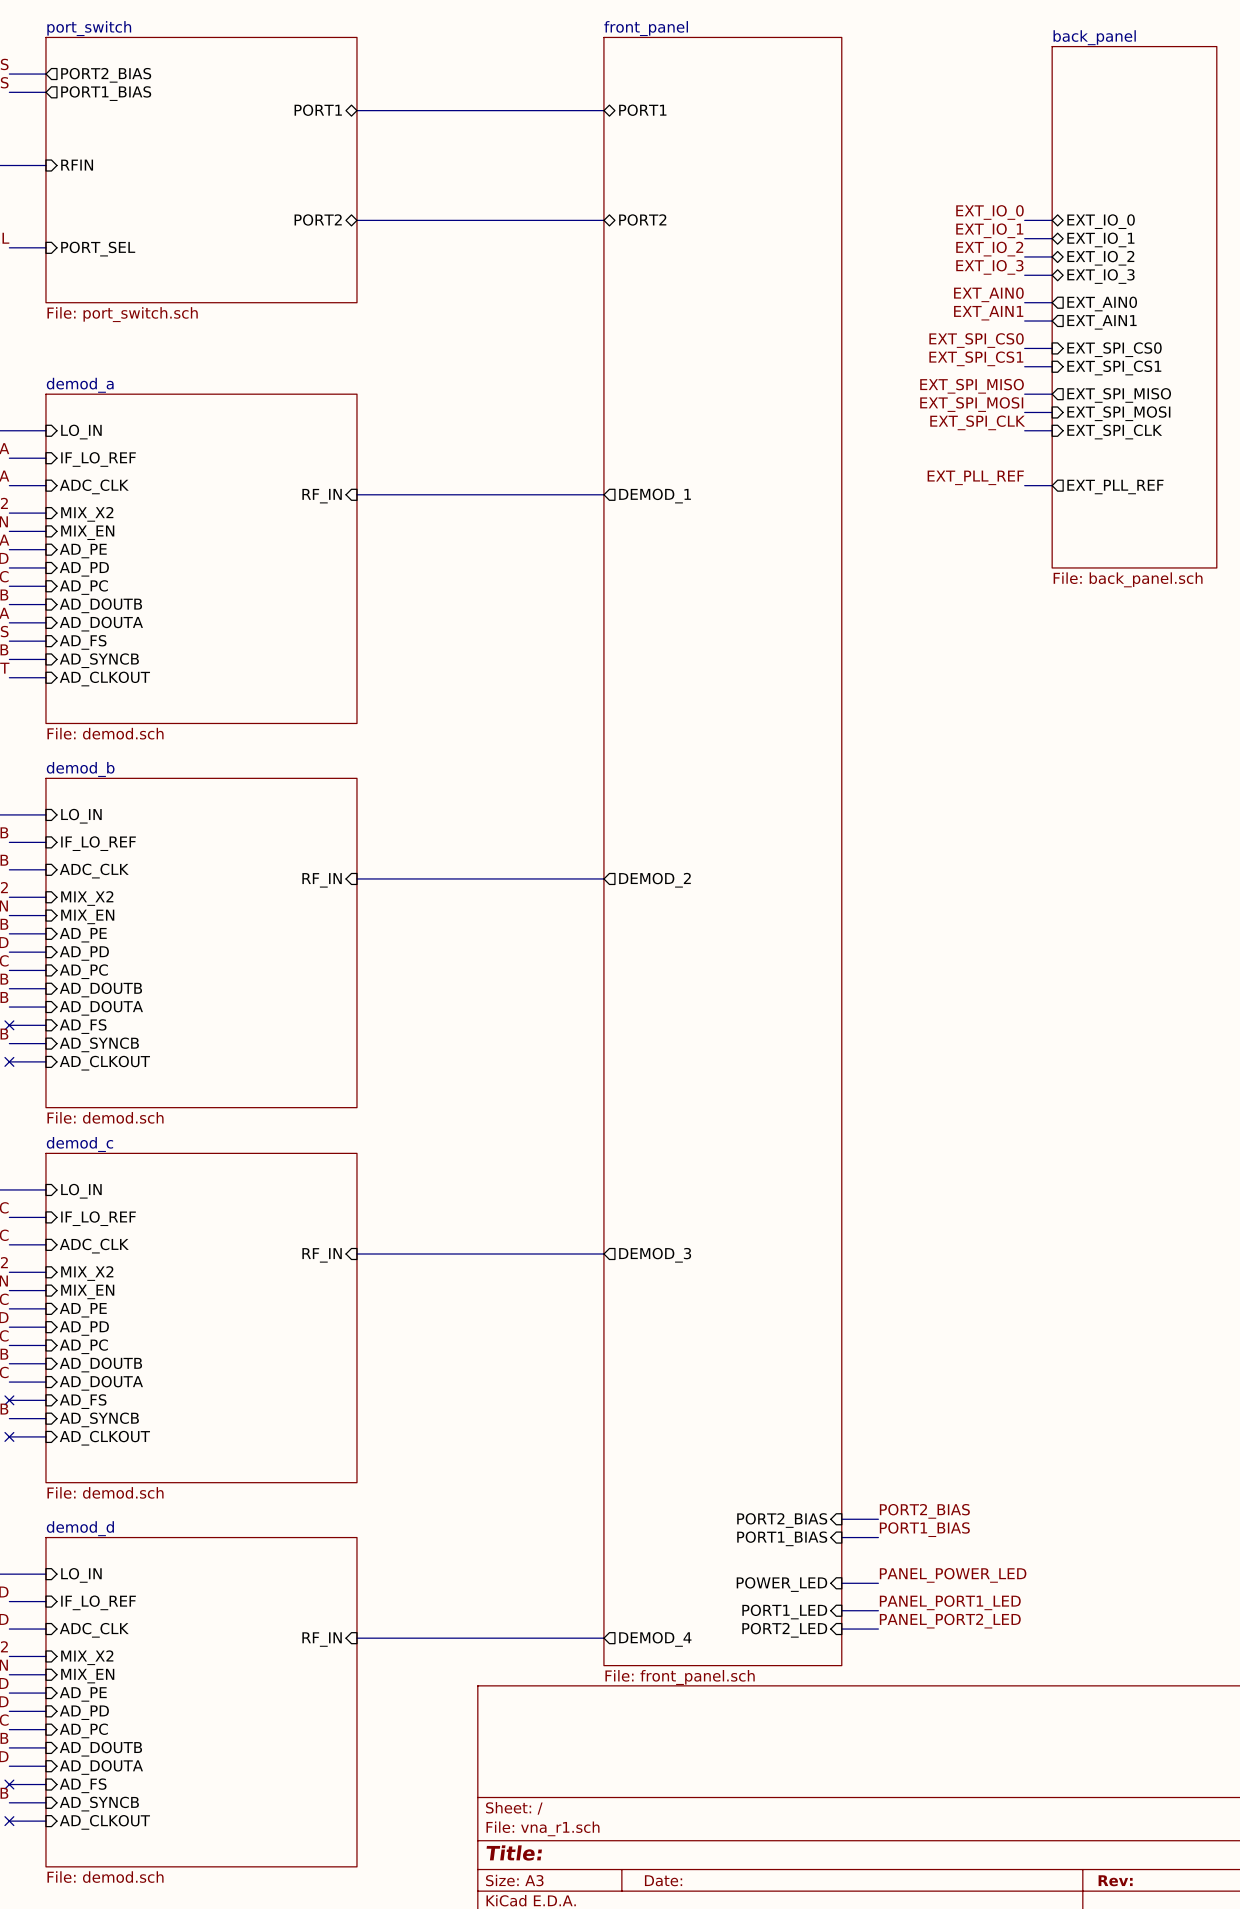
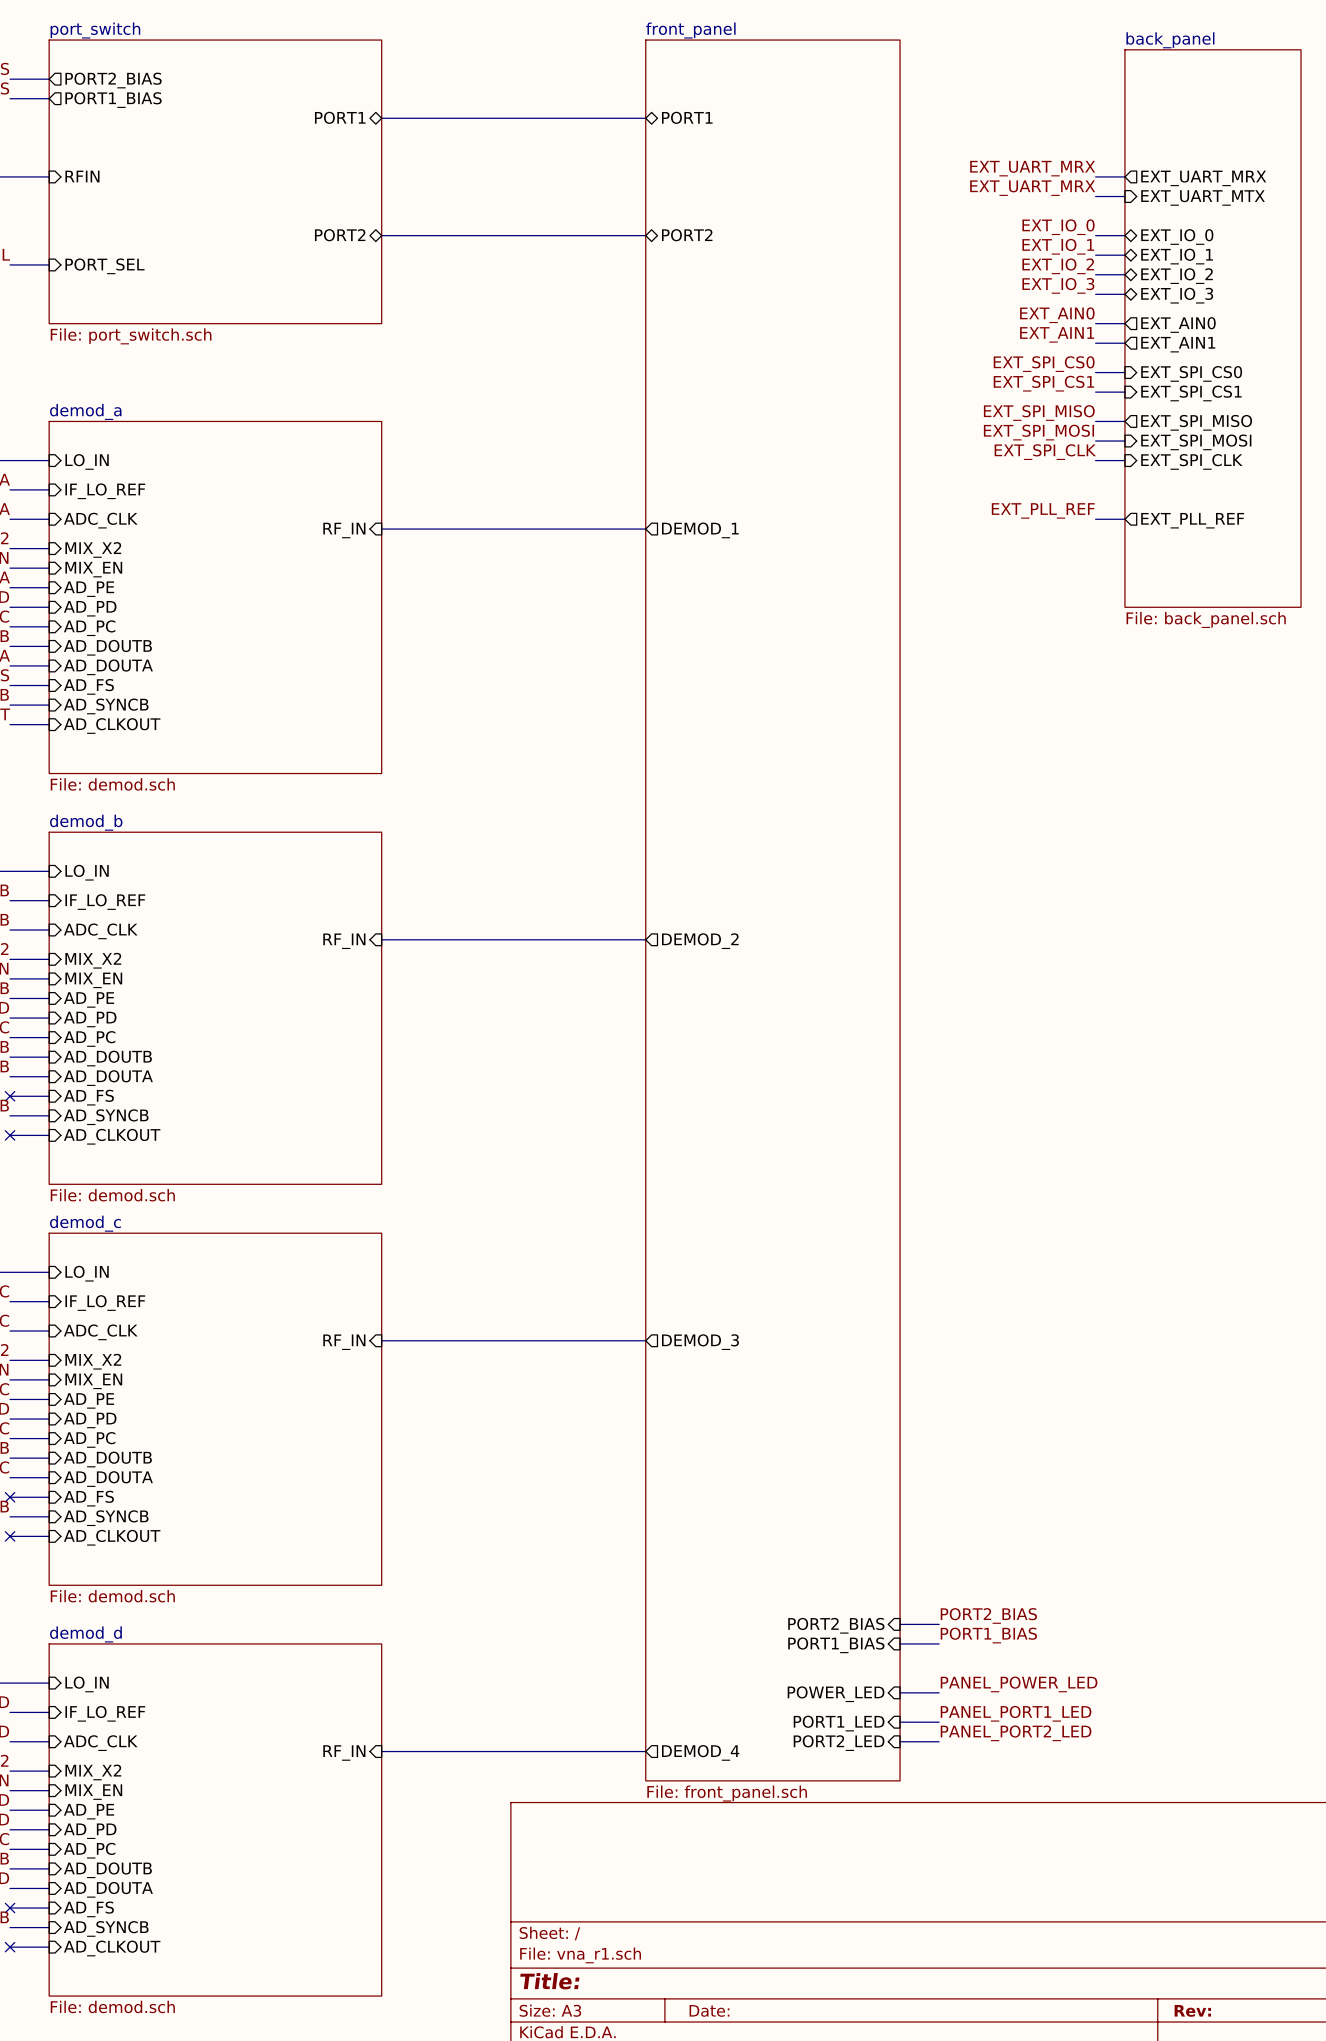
label: none -> EXT_UART_MRX (1032, 168)
wire: none -> (1095, 176) (1124, 176)
sheet pin: none -> EXT_UART_MRX (1203, 178)
label: none -> EXT_UART_MRX (1032, 188)
wire: none -> (1095, 196) (1124, 196)
sheet pin: none -> EXT_UART_MTX (1203, 197)

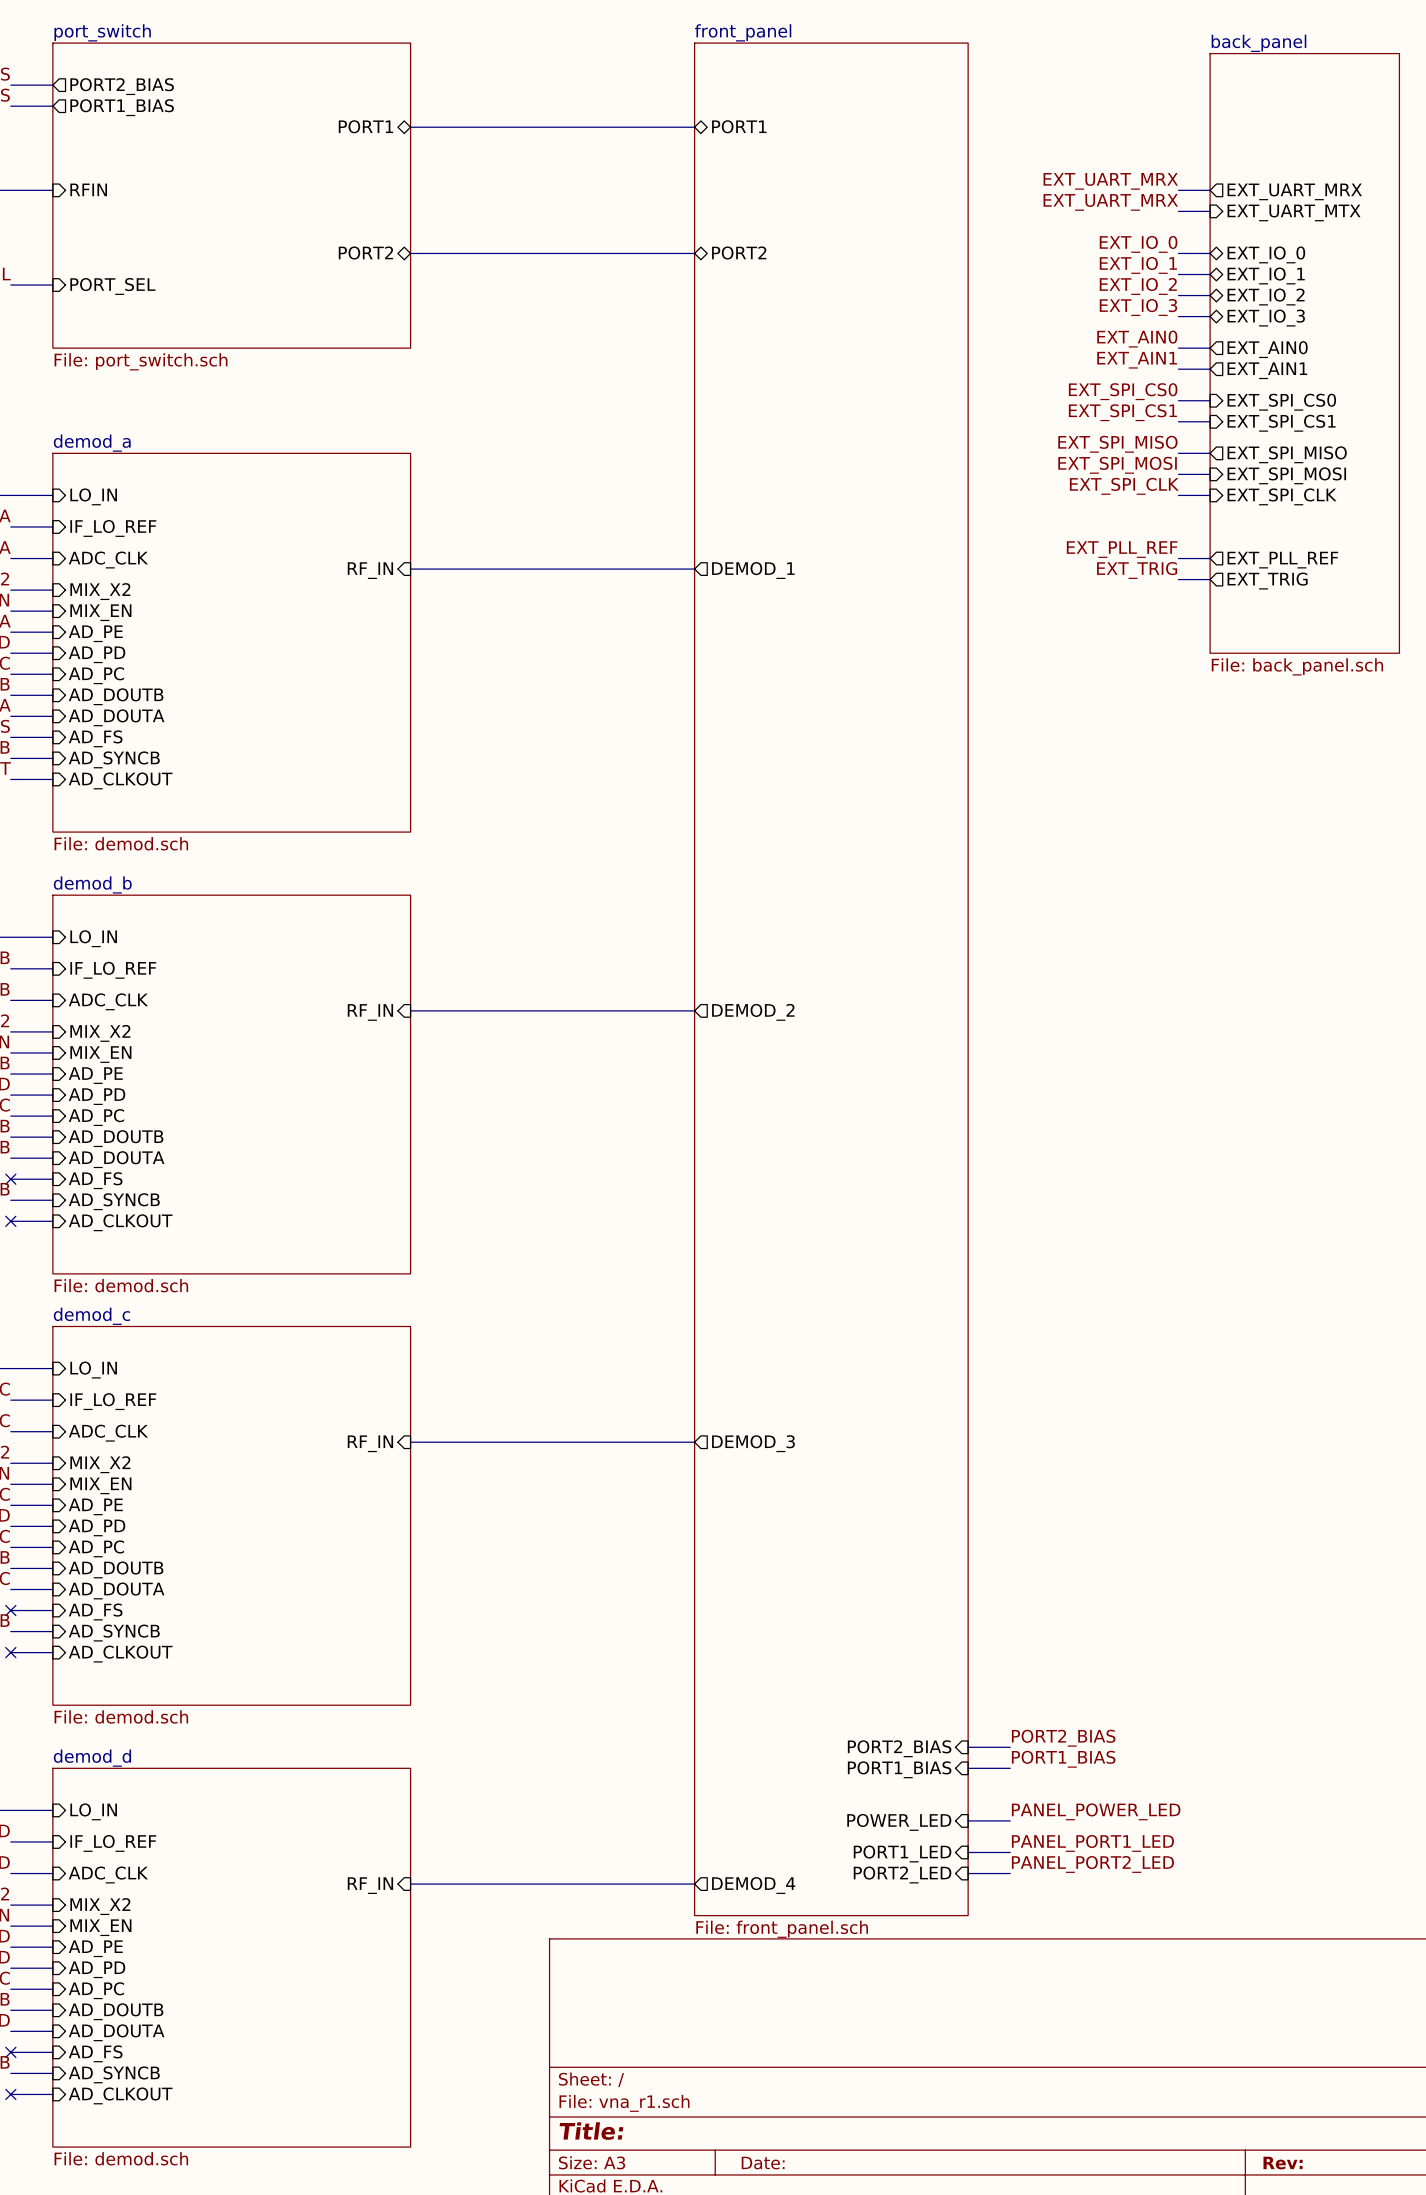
label: none -> EXT_TRIG (1137, 570)
wire: none -> (1178, 579) (1210, 579)
sheet pin: none -> EXT_TRIG (1267, 581)

